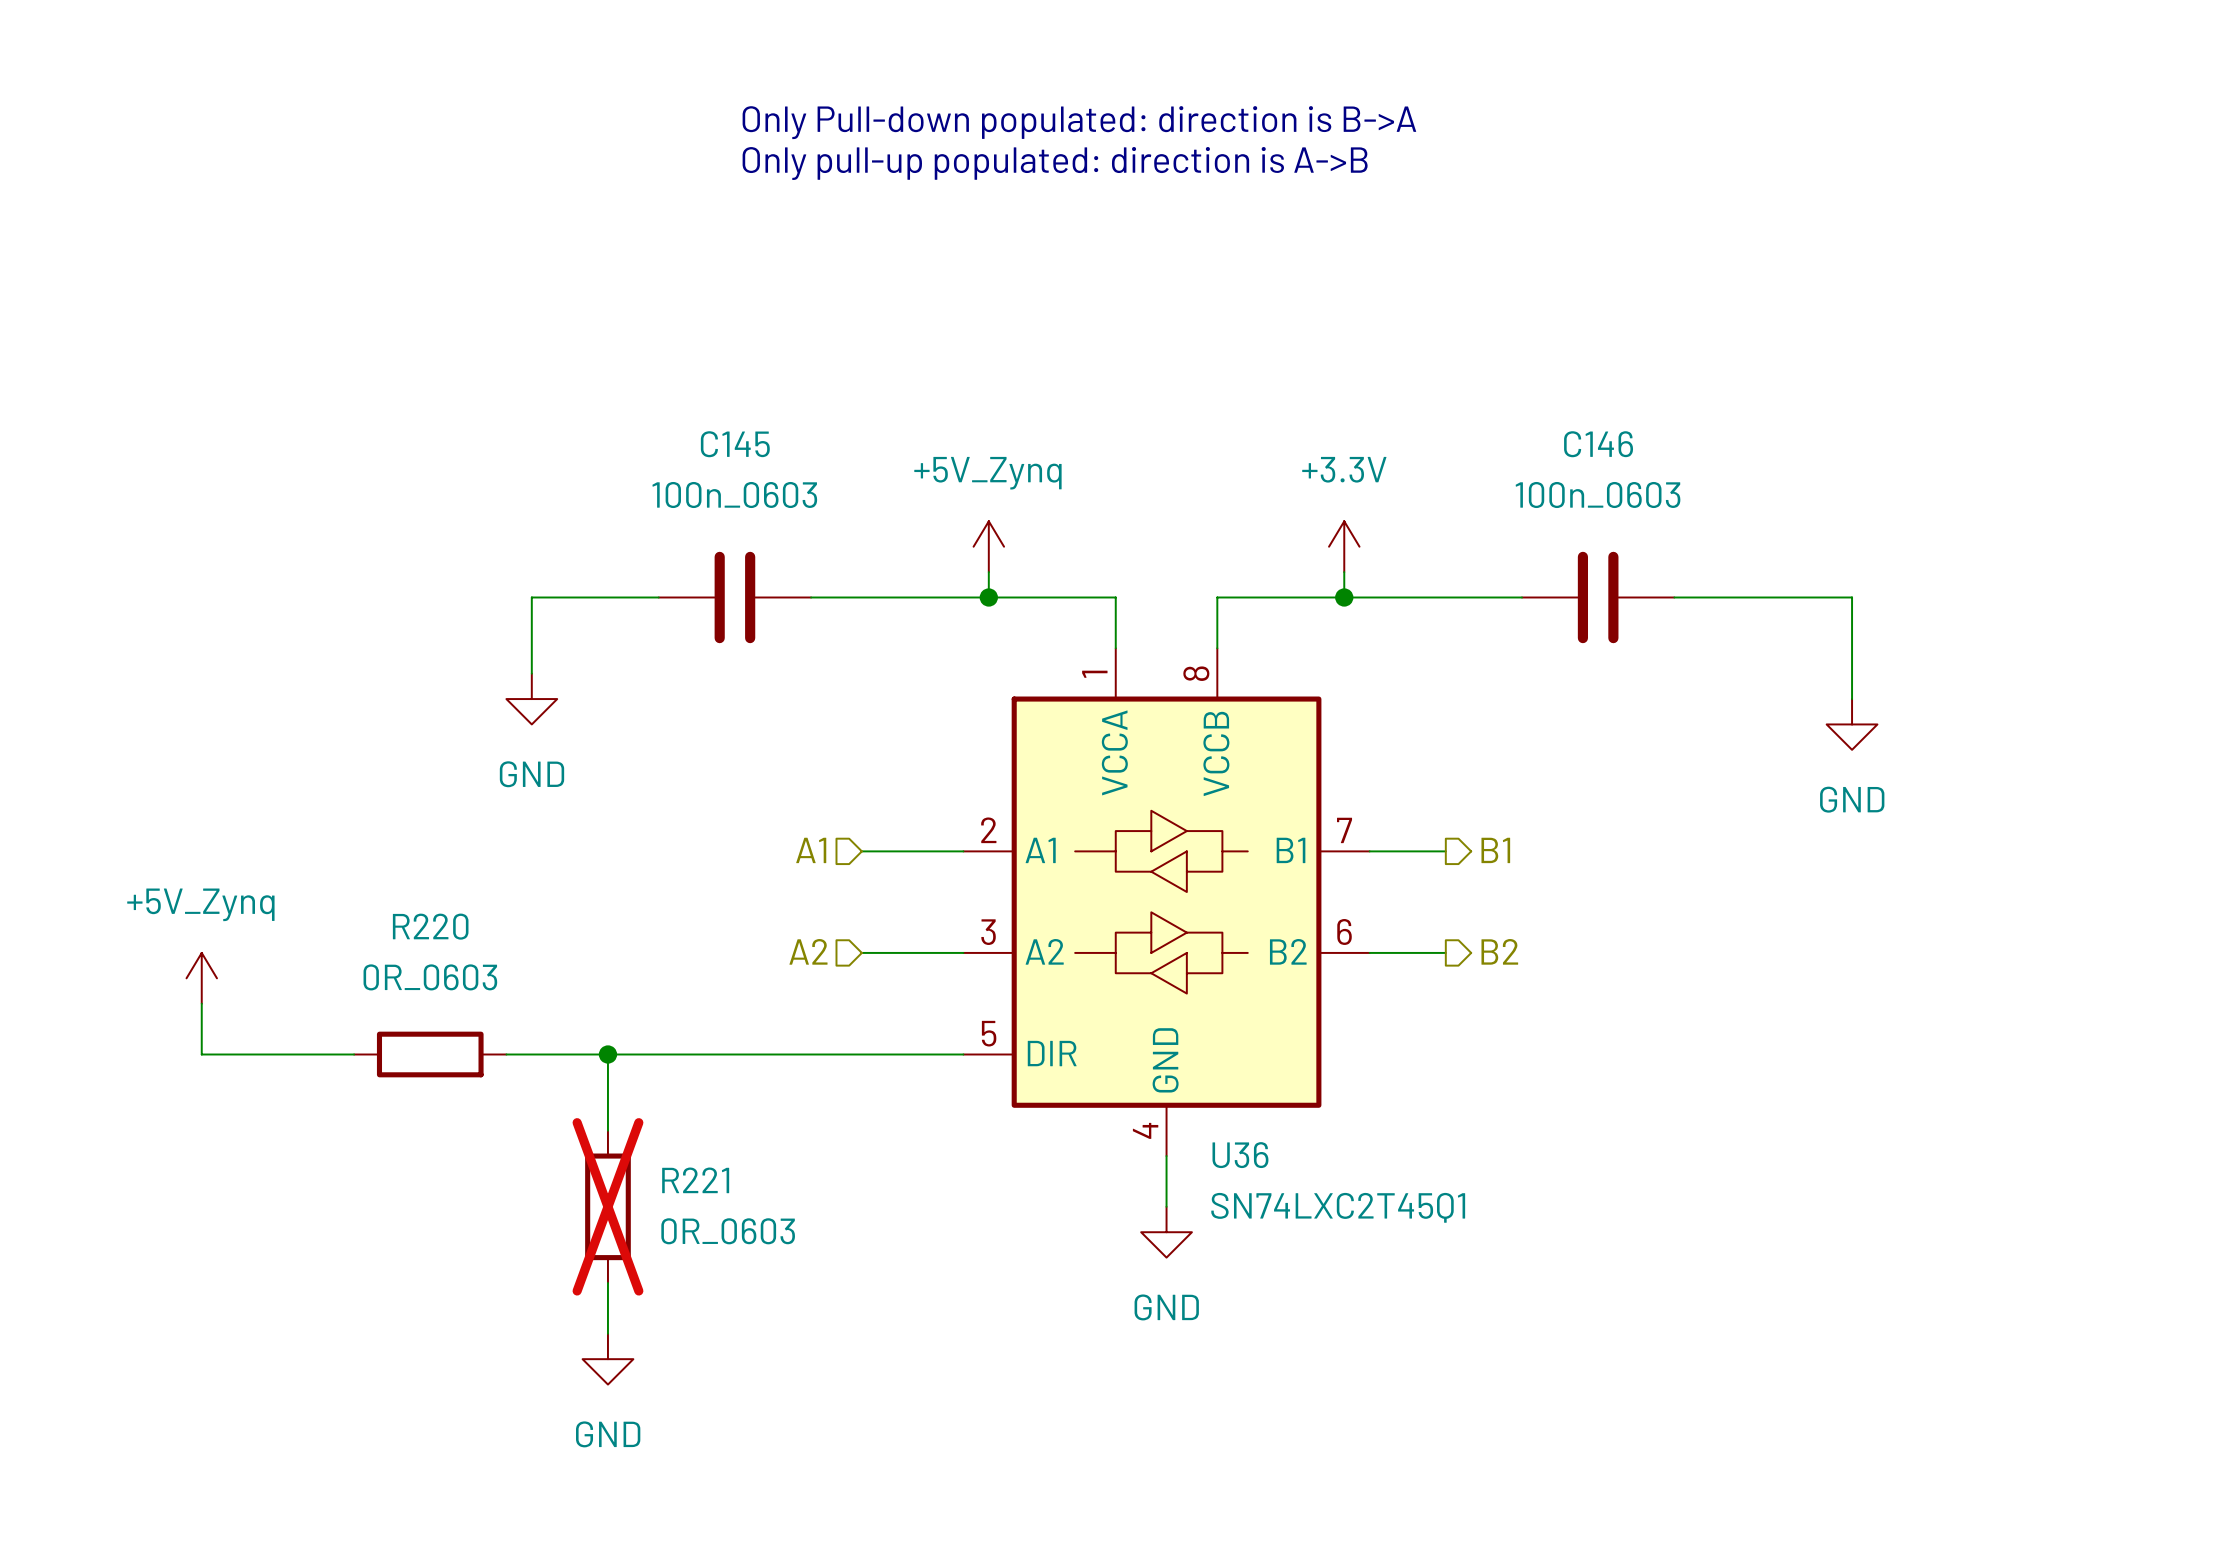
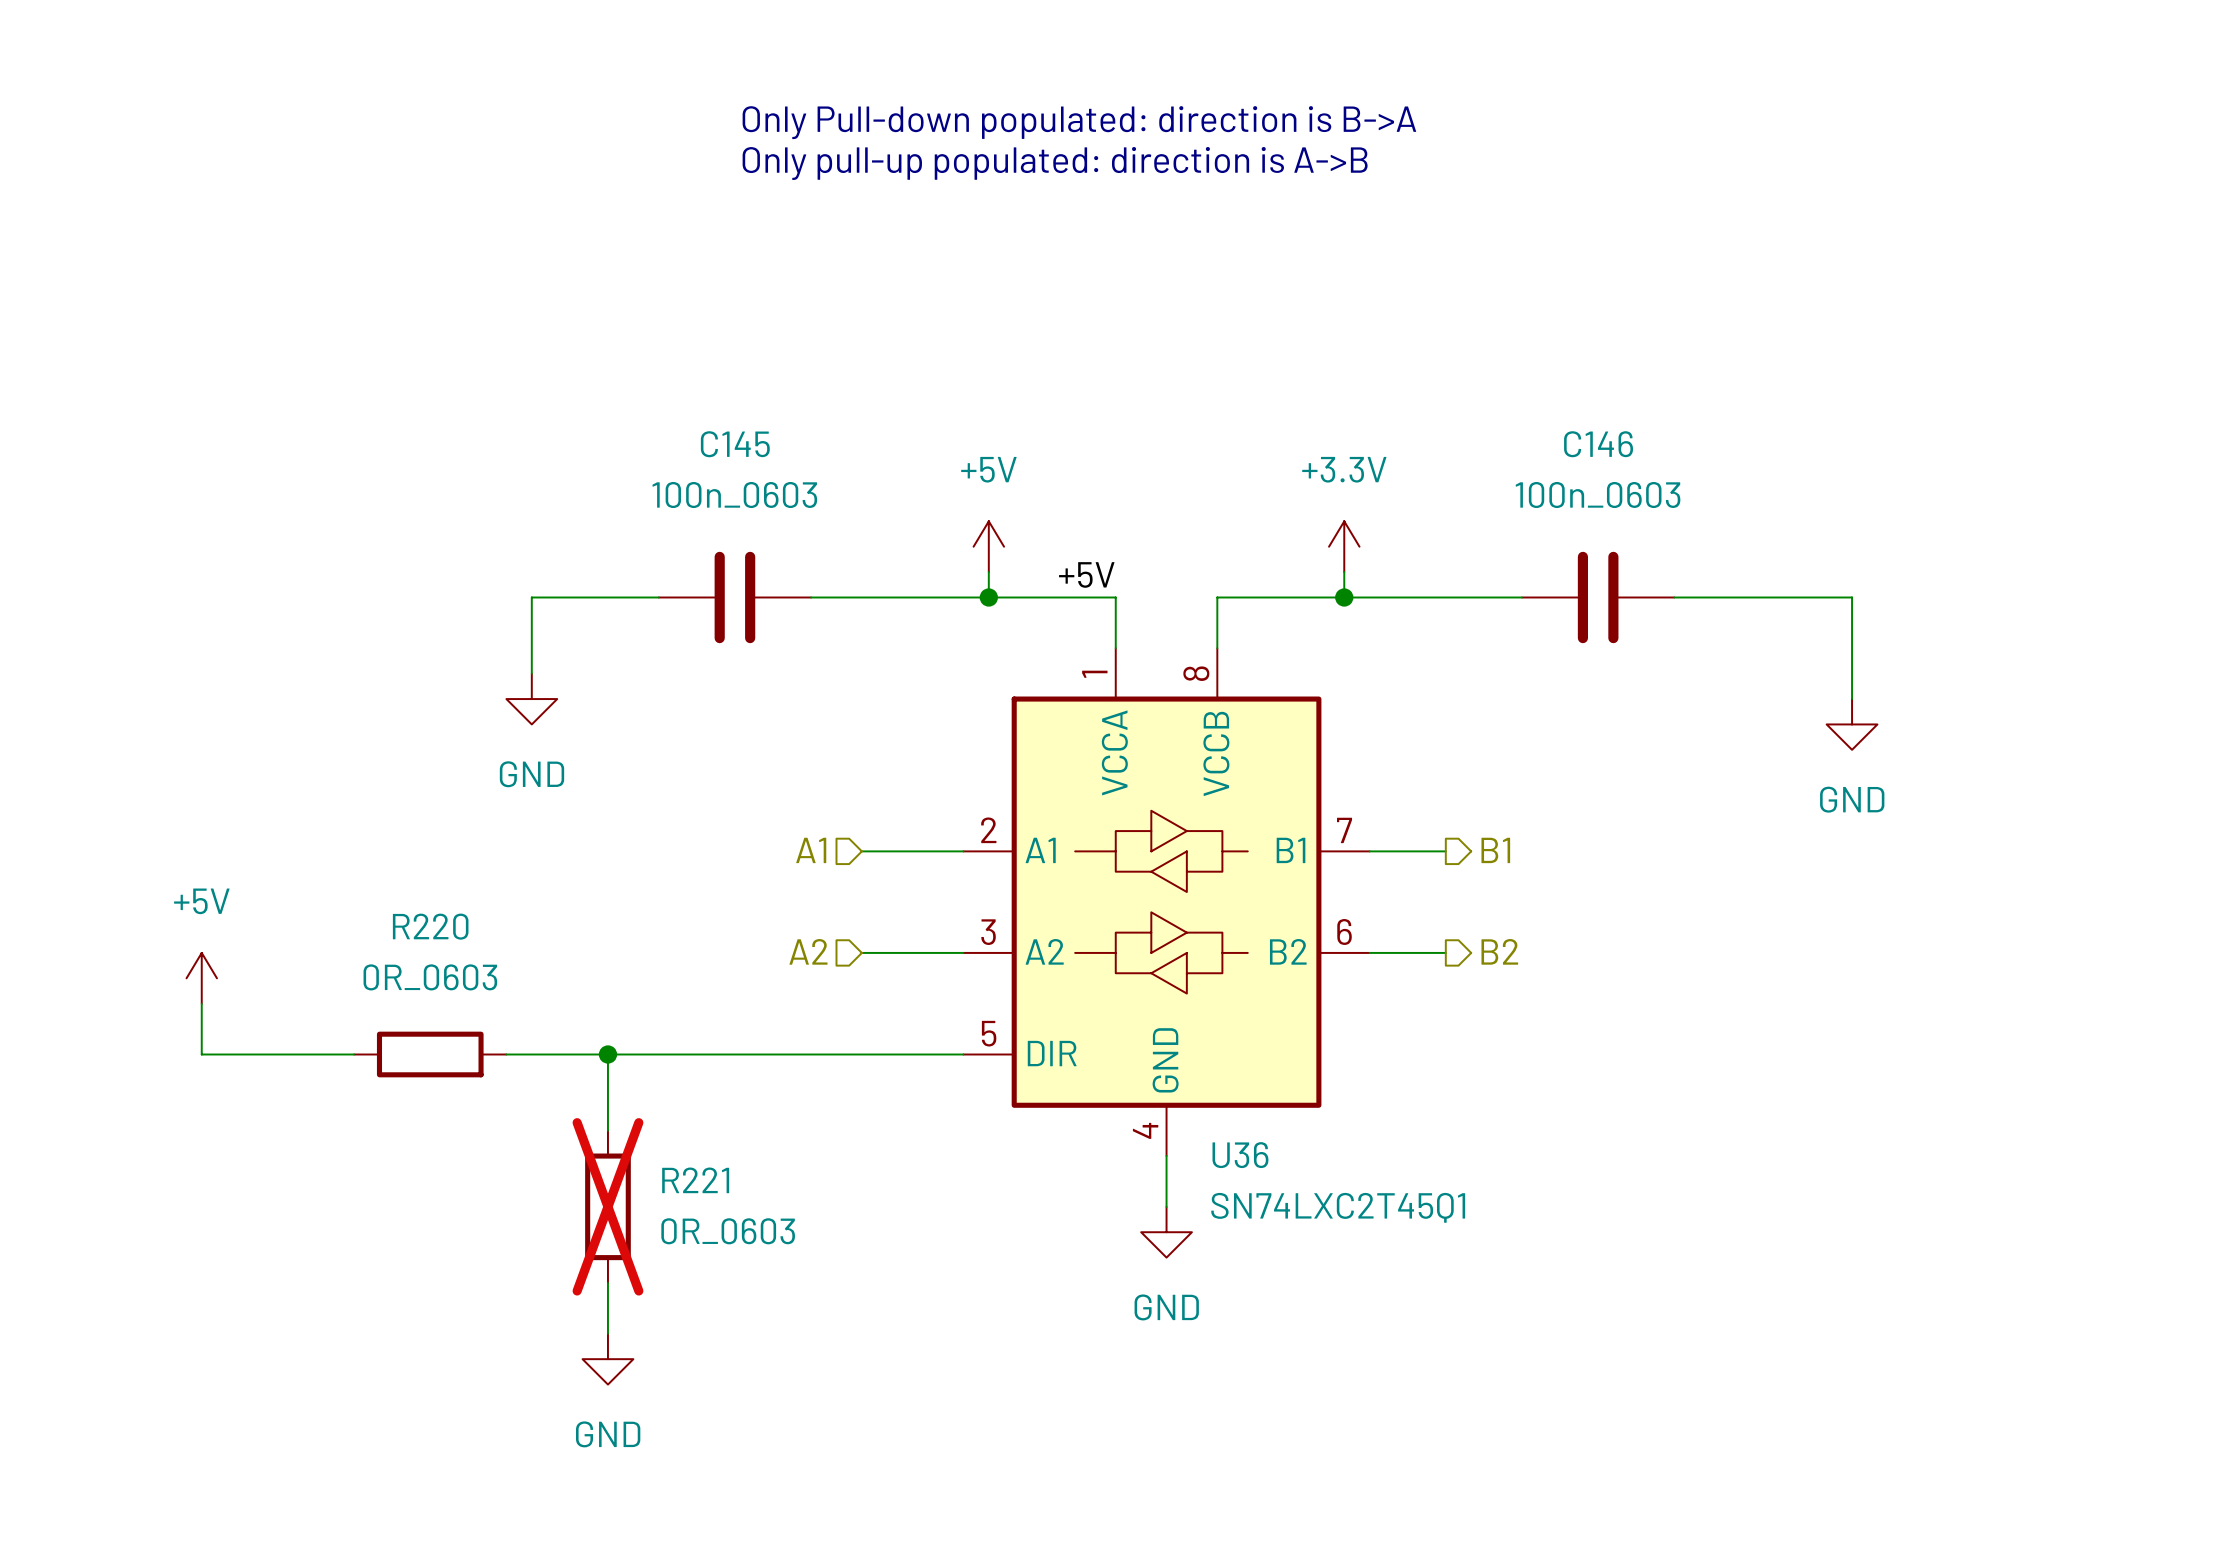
power symbol: +5V_Zynq (988, 546) -> +5V (988, 546)
label: none -> +5V (1086, 574)
power symbol: +5V_Zynq (201, 978) -> +5V (201, 978)

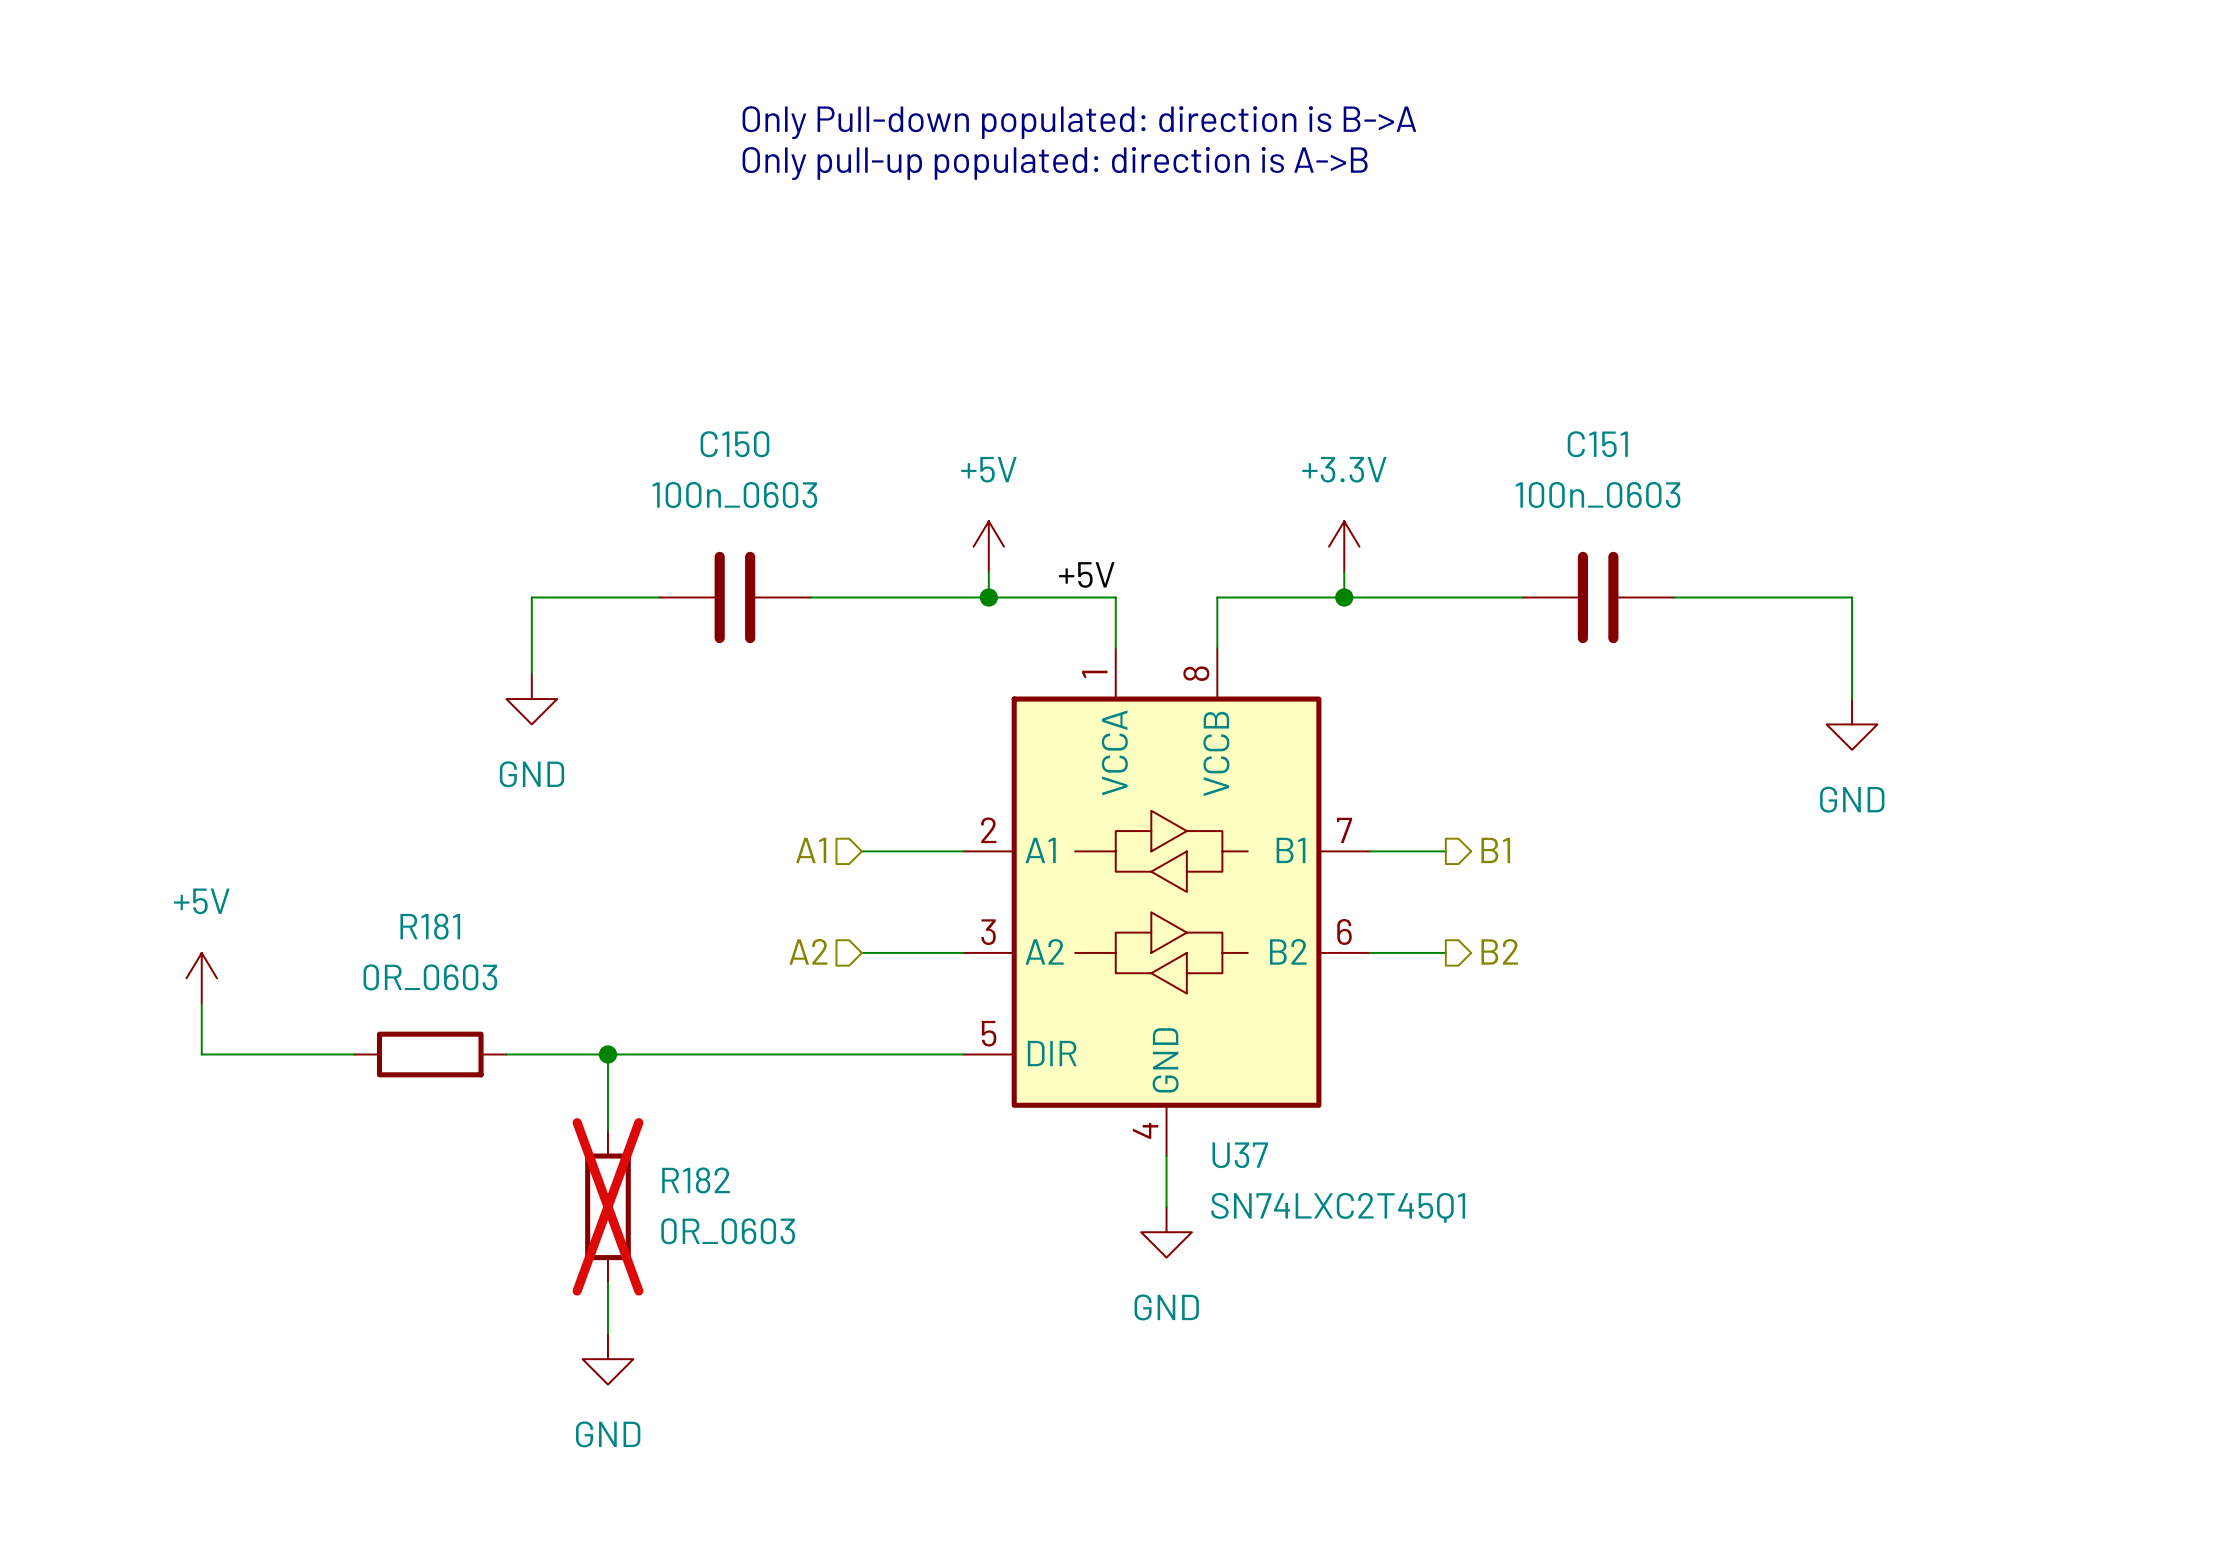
C145 name: C145 (735, 444) -> C150 (734, 444)
C146 name: C146 (1598, 444) -> C151 (1597, 444)
R220 name: R220 (430, 926) -> R181 (430, 926)
U36 name: U36 (1240, 1155) -> U37 (1240, 1155)
R221 name: R221 (695, 1180) -> R182 (696, 1180)

